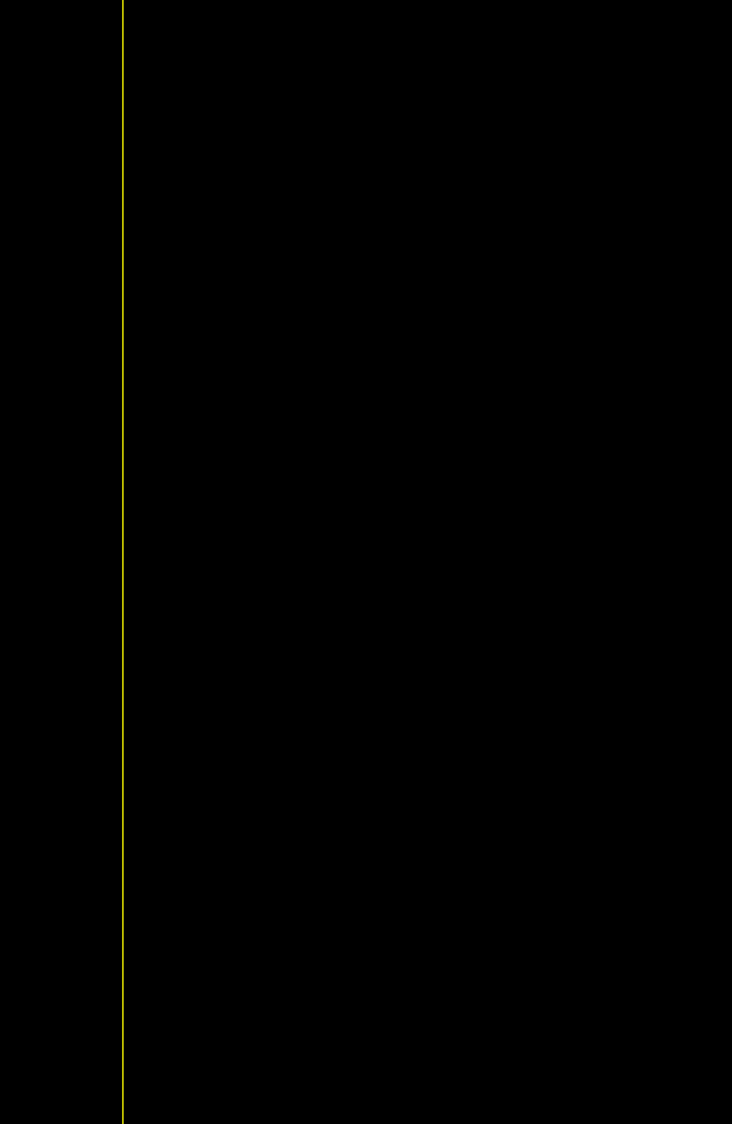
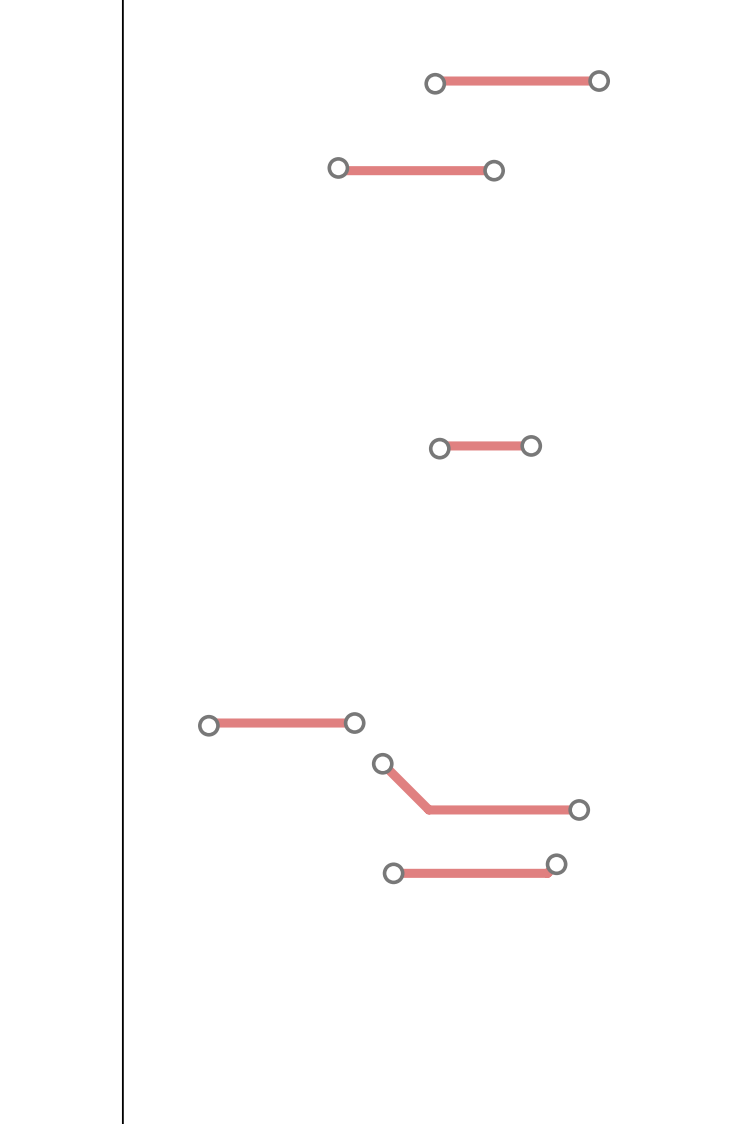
track: none -> (599, 81) (437, 81) (435, 83)
via: none -> (599, 81)
via: none -> (435, 83)
track: none -> (338, 167) (341, 170) (494, 170)
via: none -> (338, 167)
via: none -> (494, 170)
track: none -> (531, 445) (442, 445) (439, 448)
via: none -> (531, 445)
via: none -> (439, 448)
track: none -> (354, 723) (211, 723) (208, 725)
via: none -> (354, 723)
via: none -> (208, 725)
track: none -> (382, 763) (428, 809) (579, 809)
via: none -> (382, 763)
via: none -> (579, 809)
track: none -> (556, 864) (547, 873) (393, 873)
via: none -> (556, 864)
via: none -> (393, 873)

